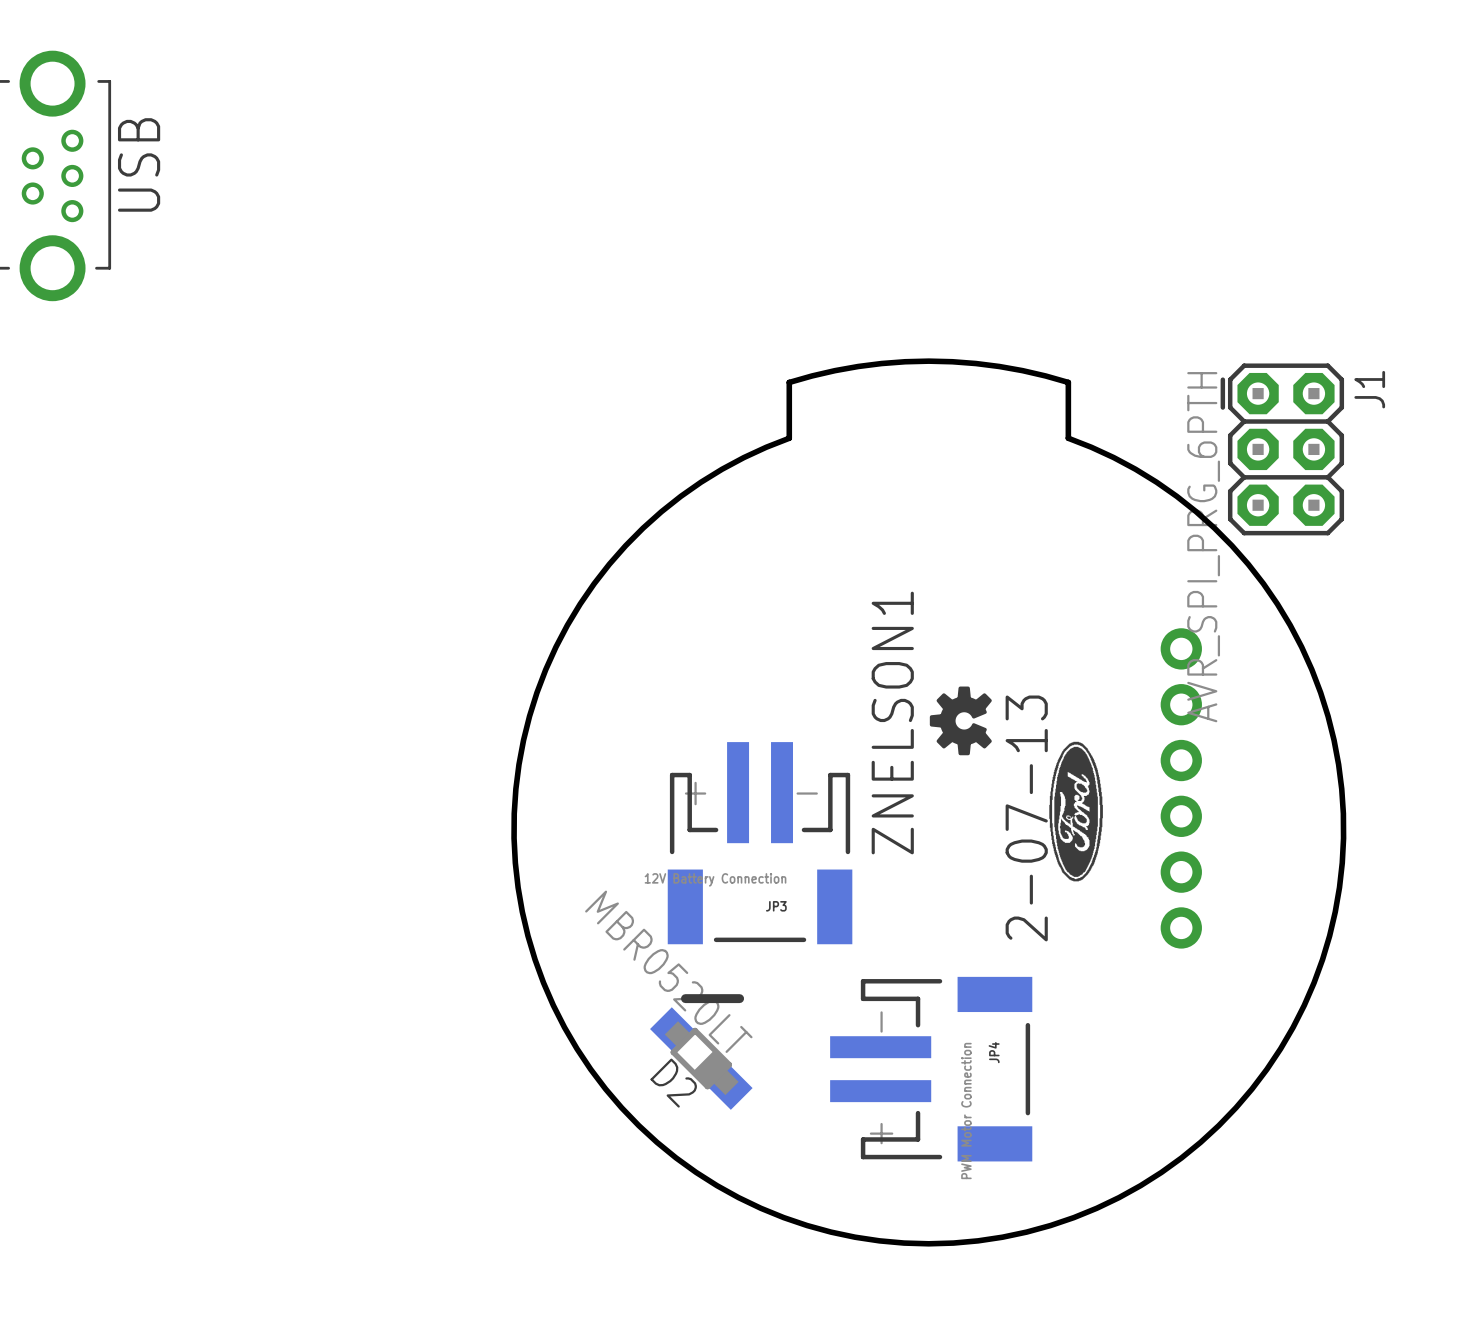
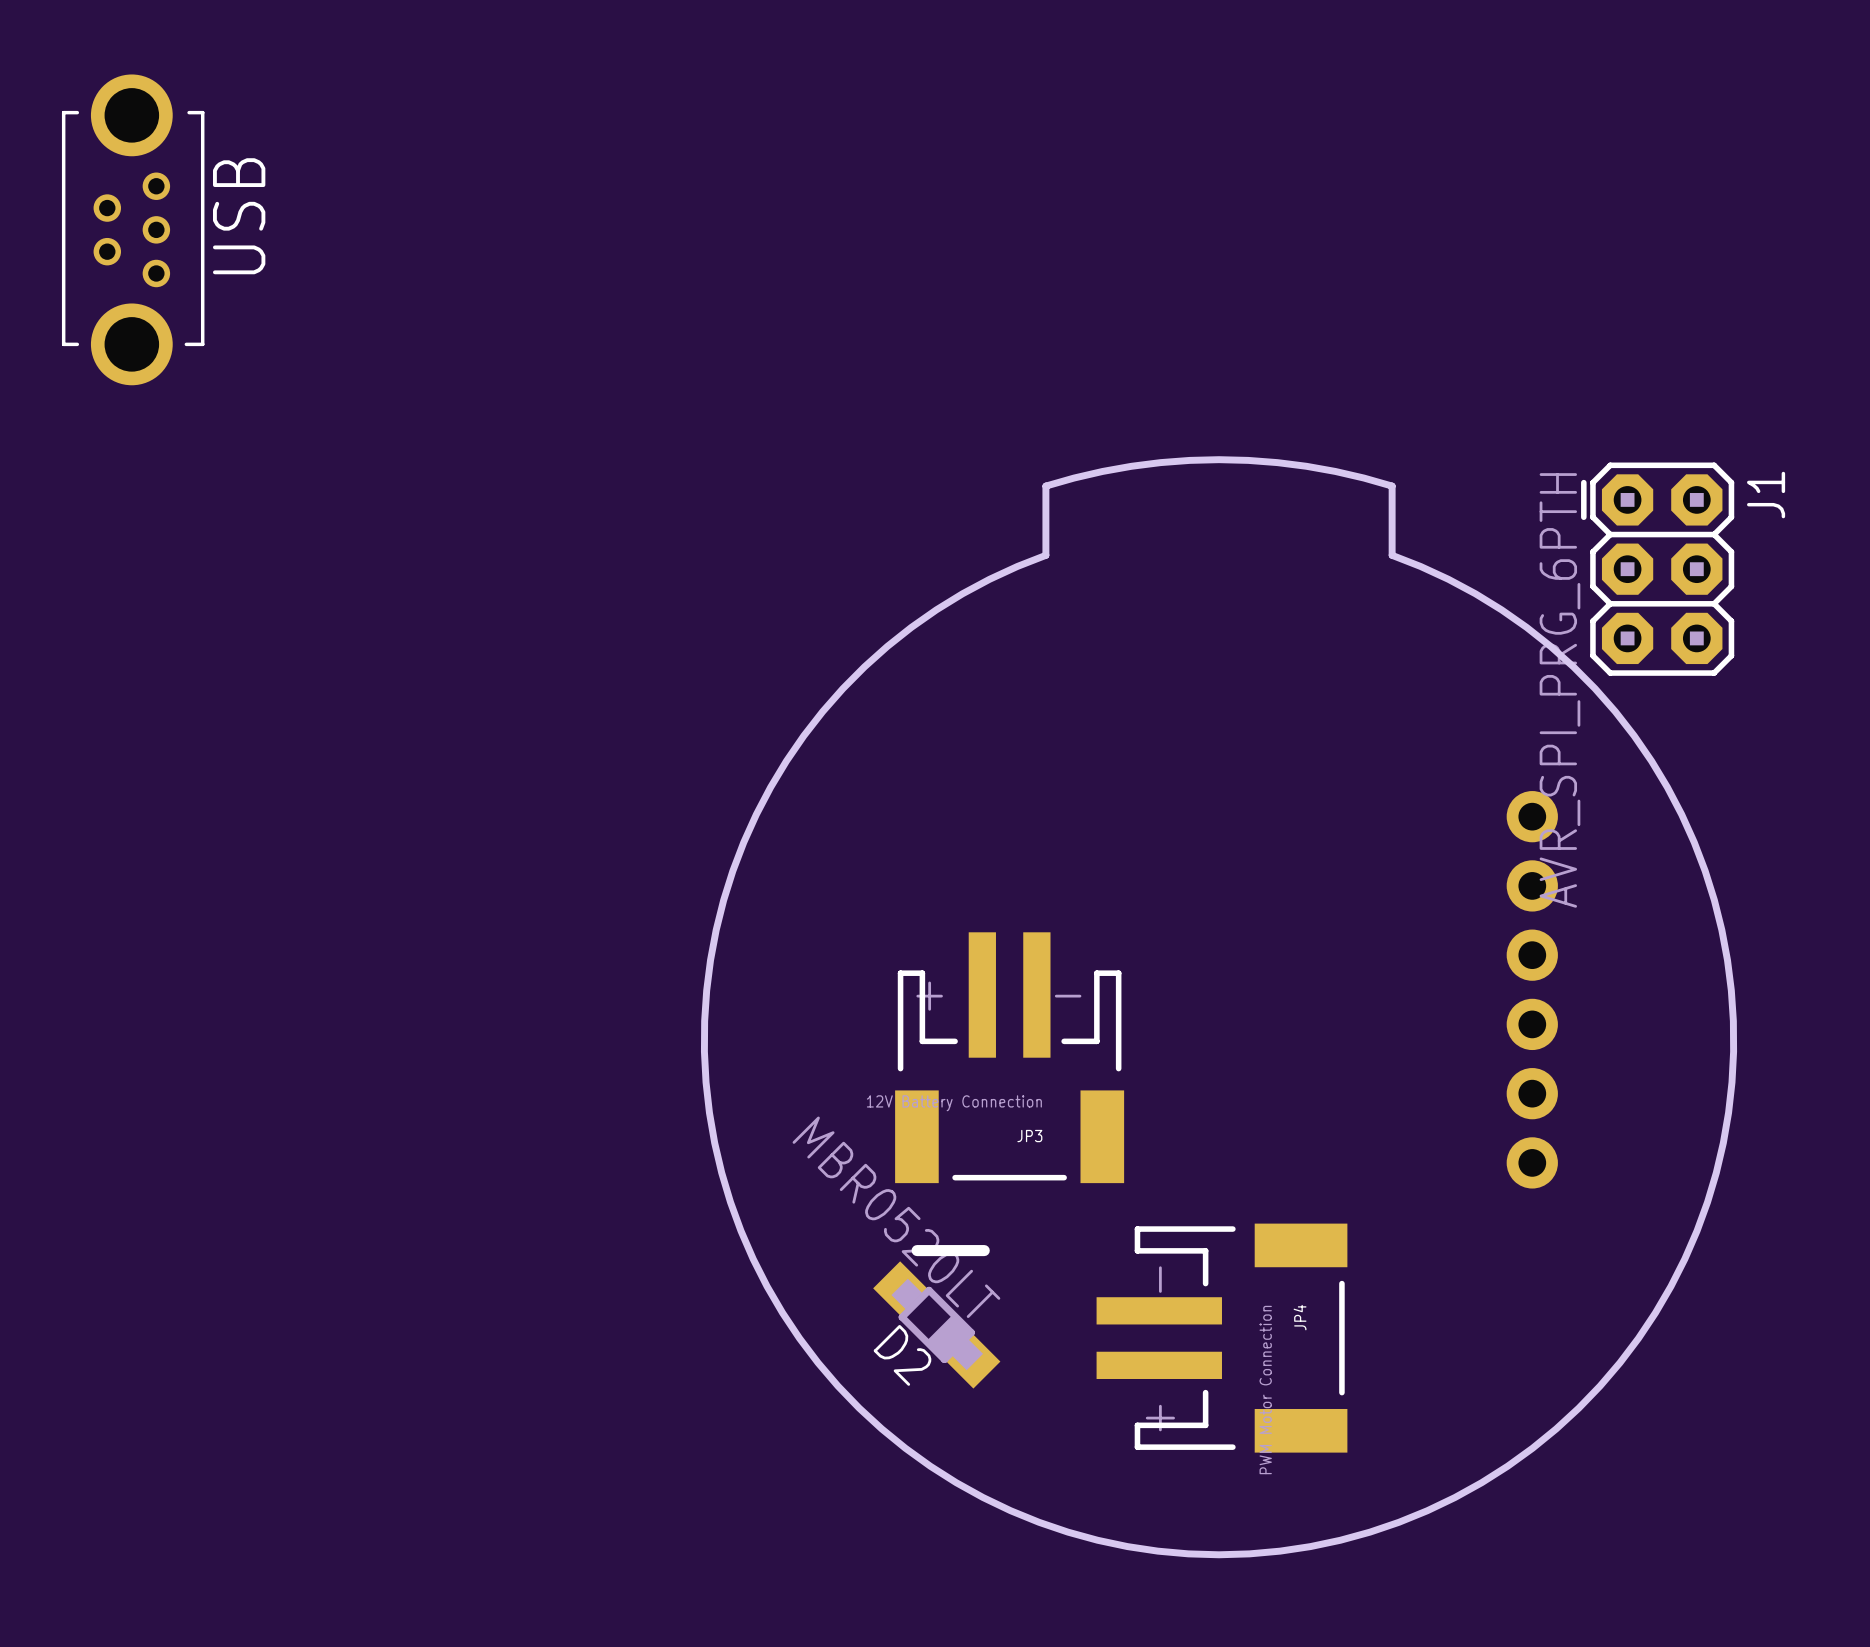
drawing: [929, 686, 992, 756] -> none
text: ZNELSON1 (892, 723) -> none
drawing: [1049, 741, 1103, 882] -> none
text: 2-07-13 (1026, 818) -> none

